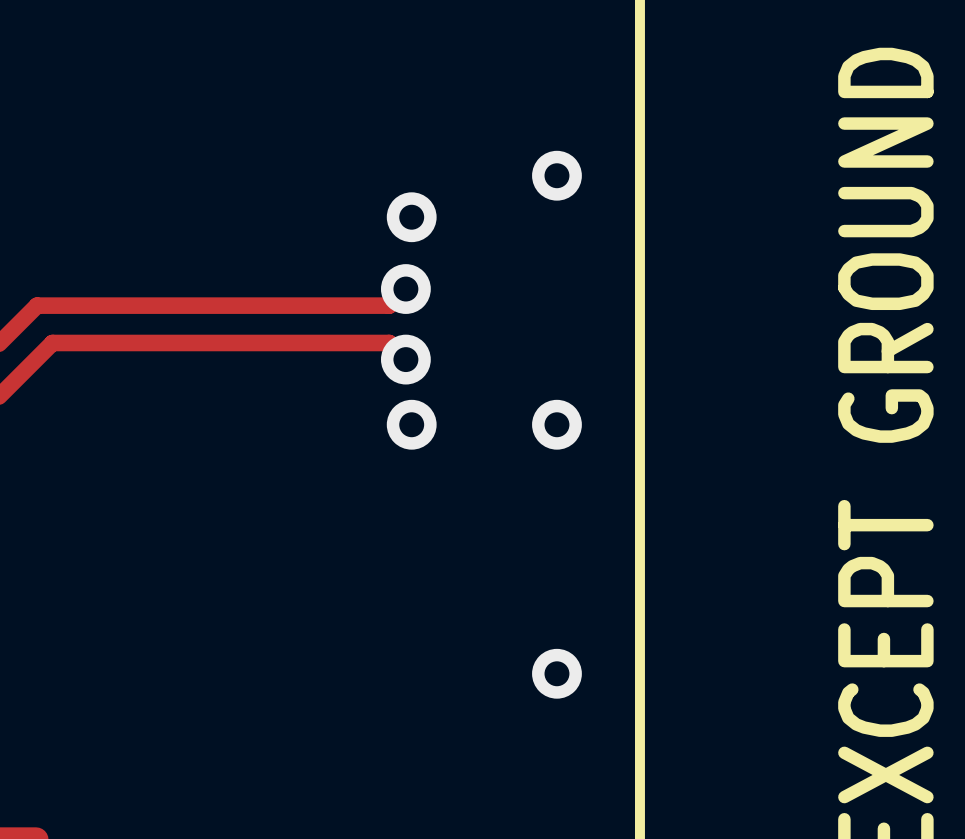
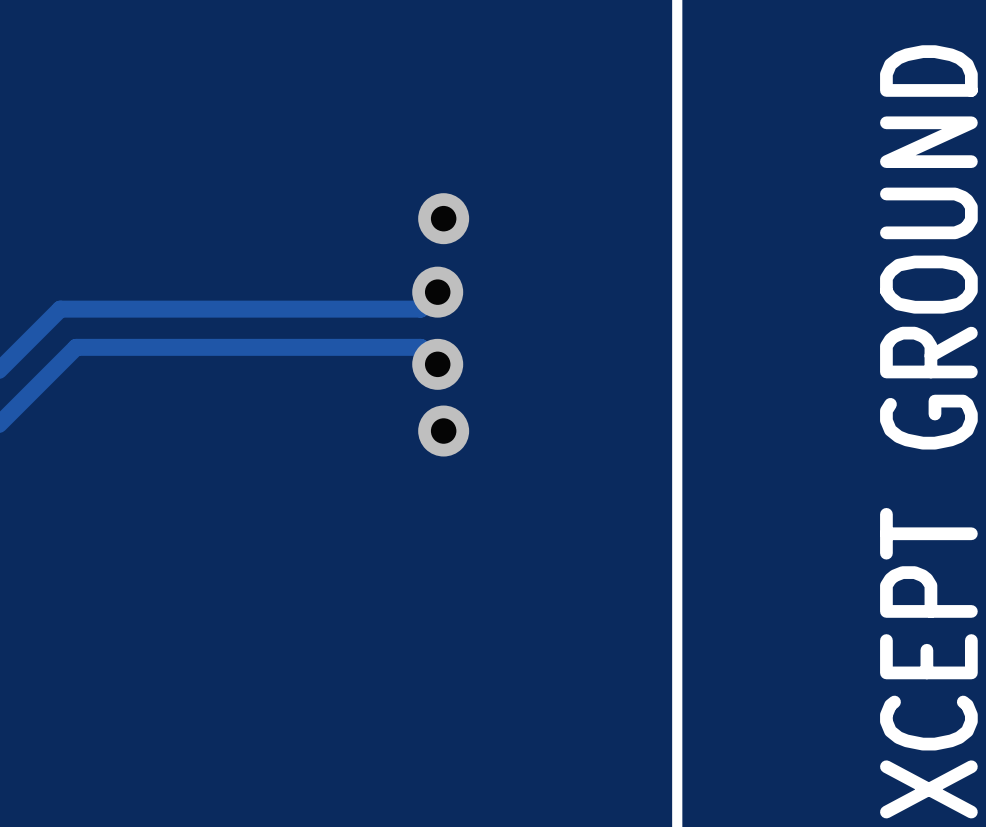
via: (556, 175) -> none
via: (556, 424) -> none
via: (556, 673) -> none

